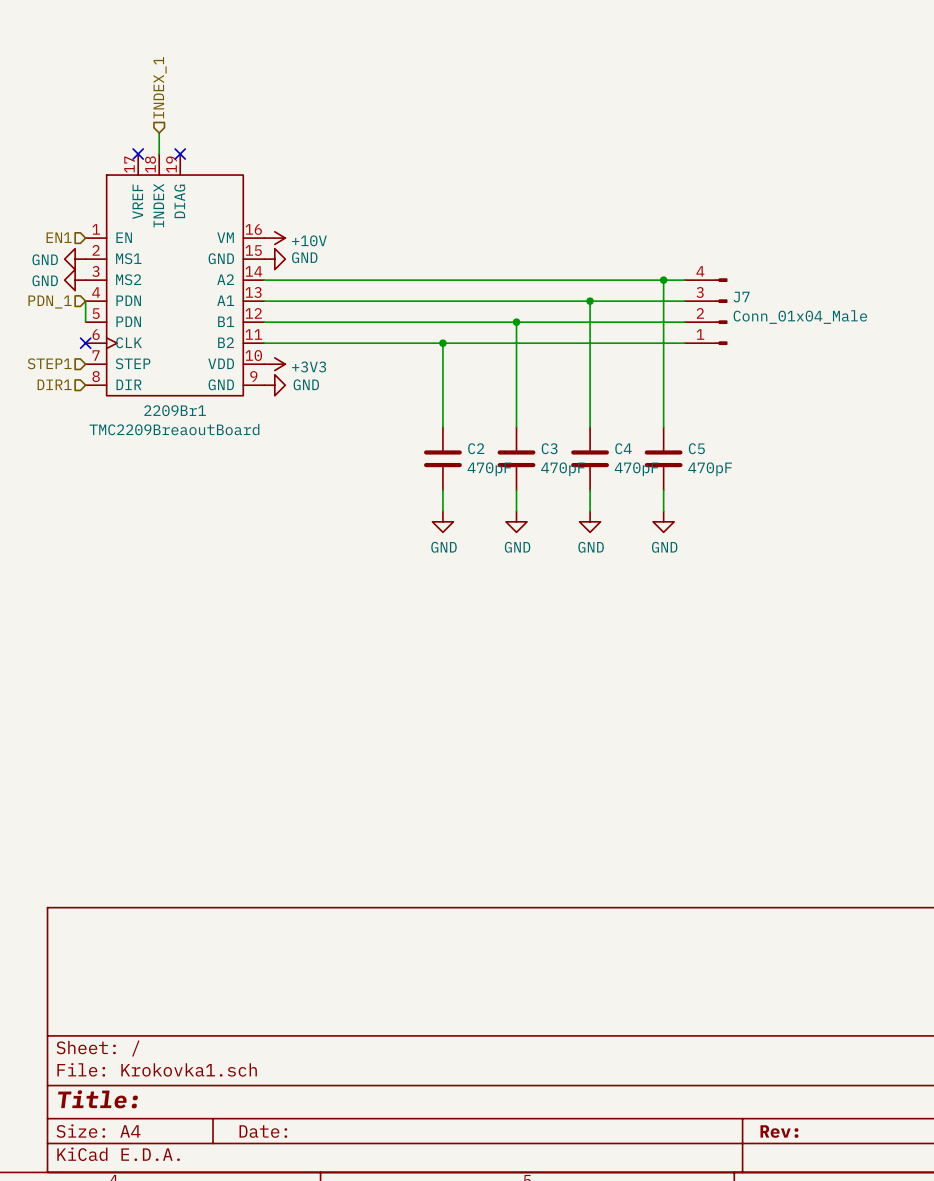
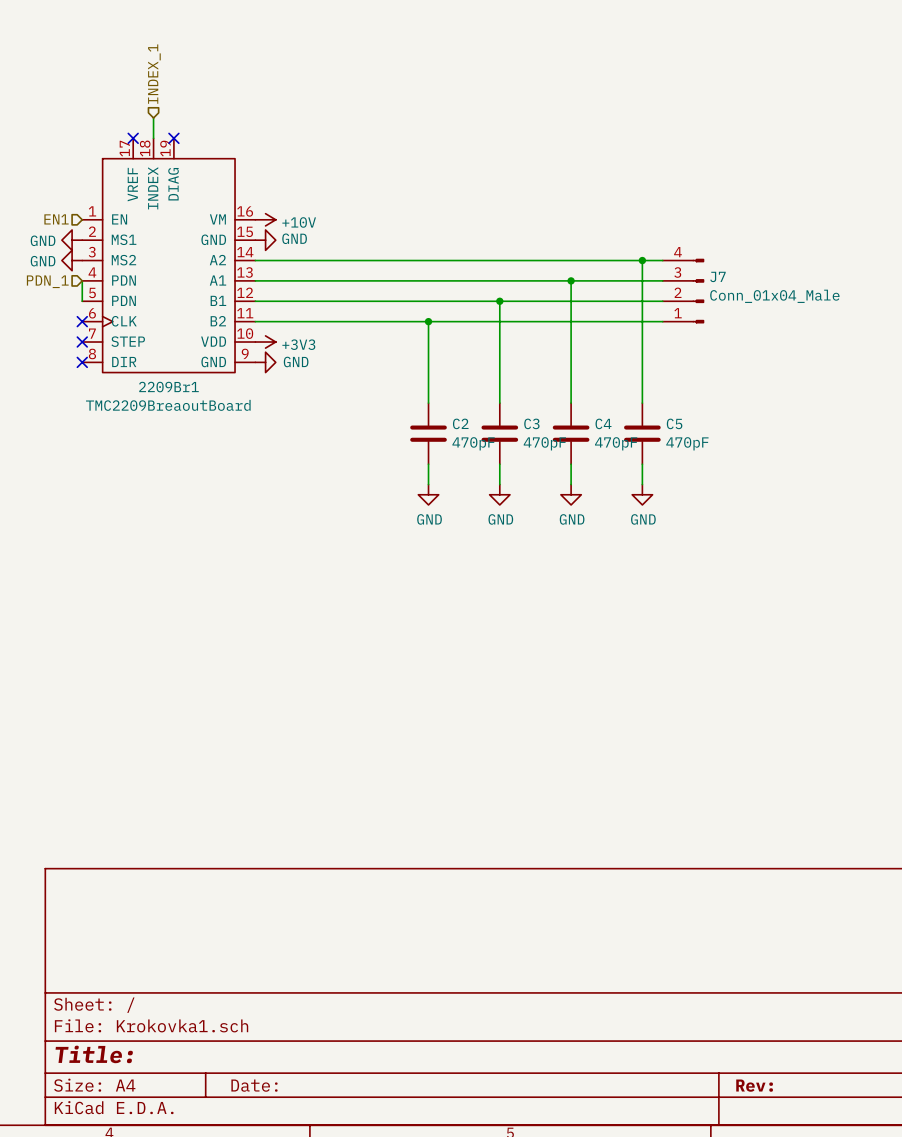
hierarchical label: STEP1 (49, 363) -> none
no-connect mark: none -> (82, 342)
hierarchical label: DIR1 (54, 384) -> none
no-connect mark: none -> (82, 362)

